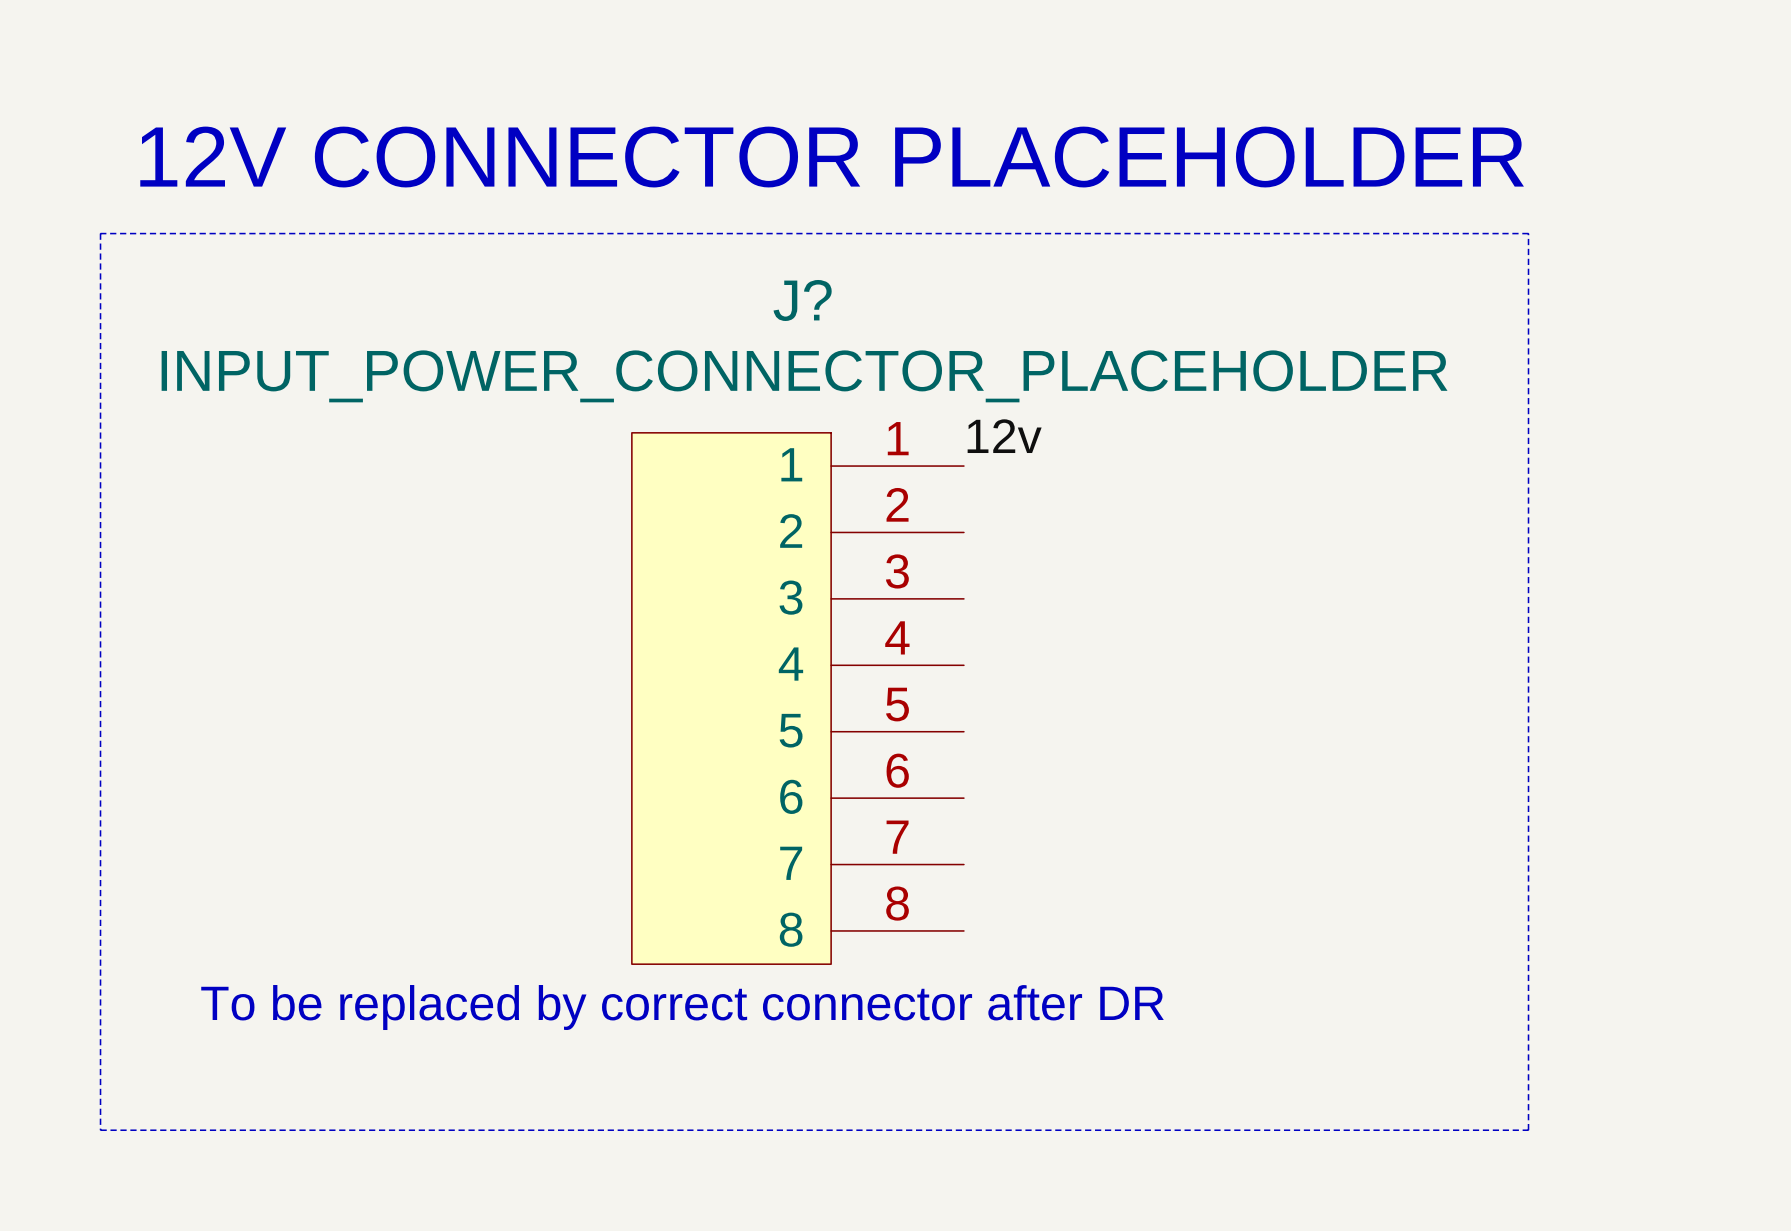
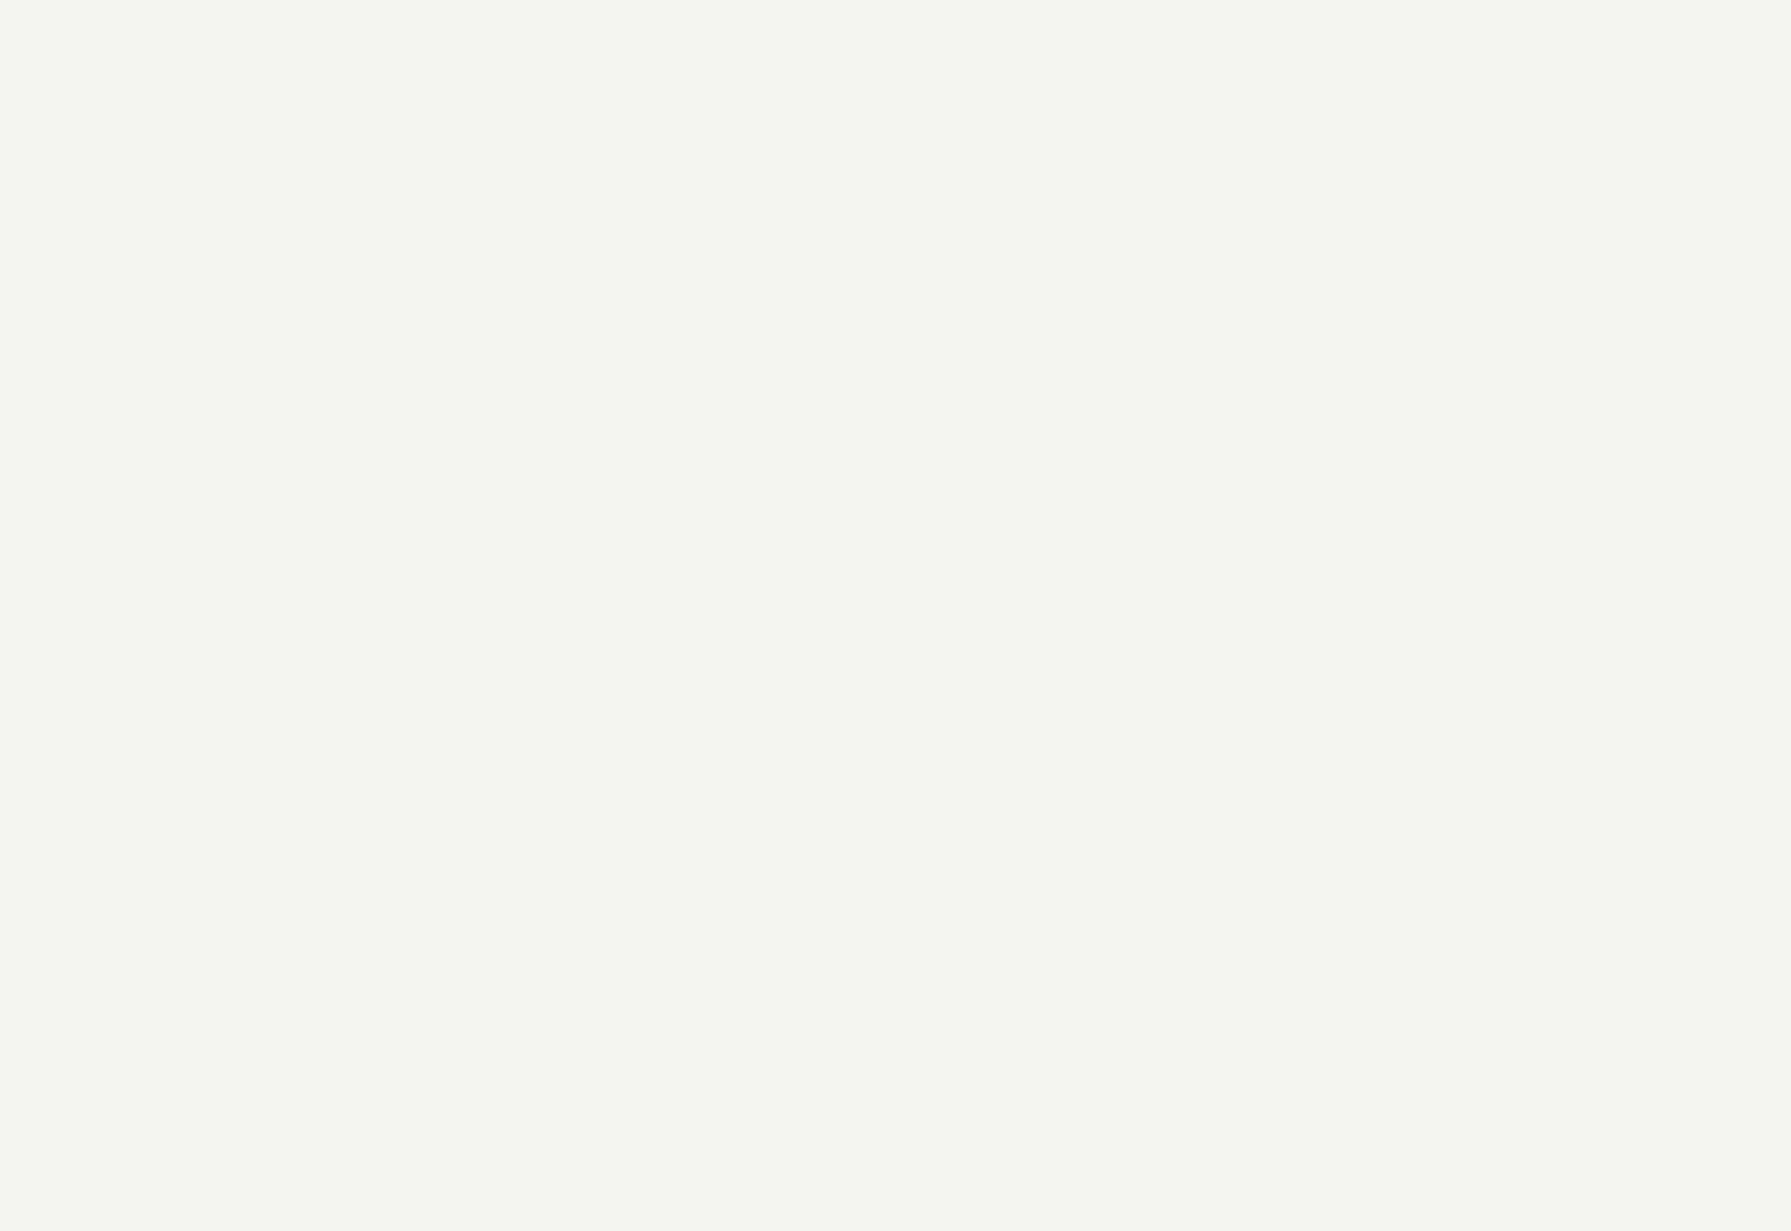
text: 12V CONNECTOR PLACEHOLDER (832, 157) -> none
line: (100, 233) (100, 1130) (1528, 1130) (1528, 233) (100, 233) -> none
label: 12v (1004, 436) -> none
J?: INPUT_POWER_CONNECTOR_PLACEHOLDER (797, 698) -> none
text: To be replaced by correct connector after DR (682, 1007) -> none

